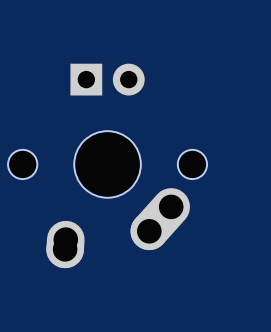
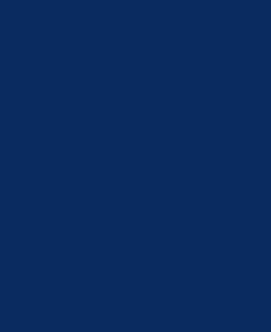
part: (107, 165) -> none

